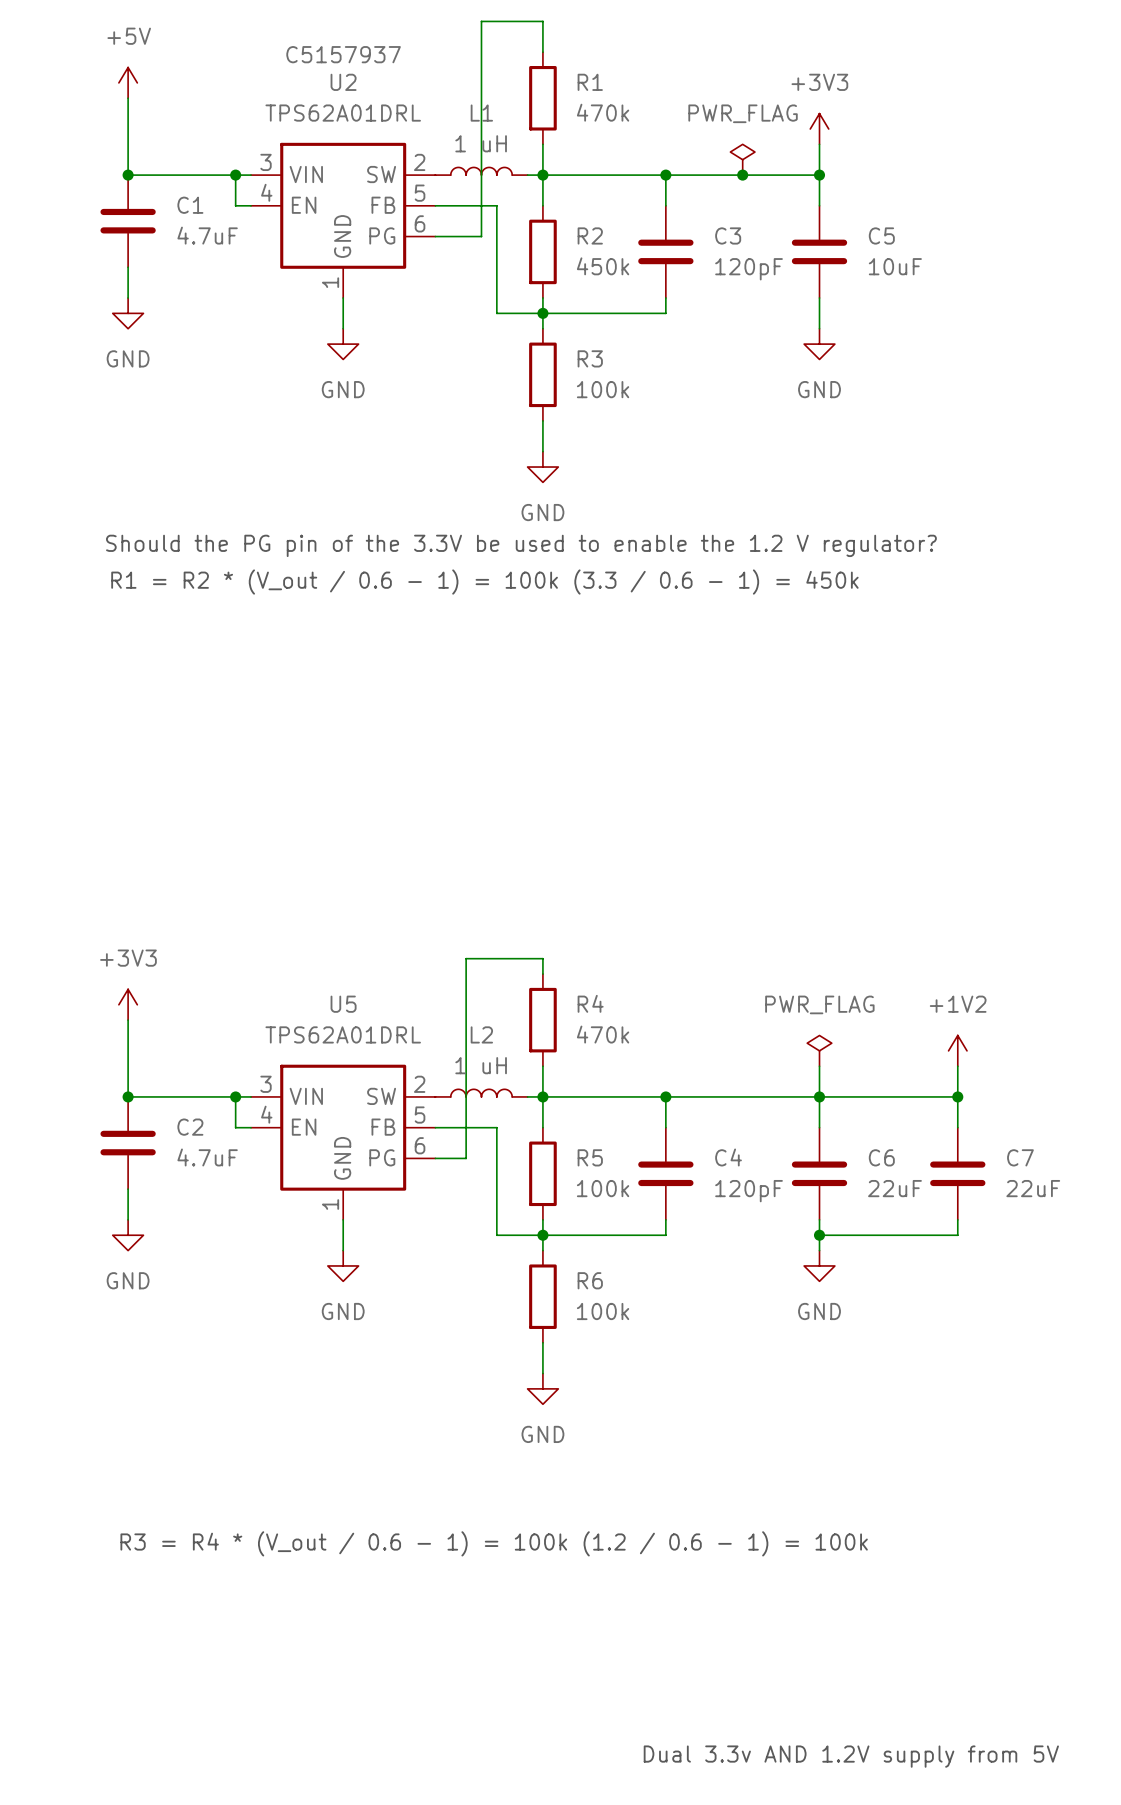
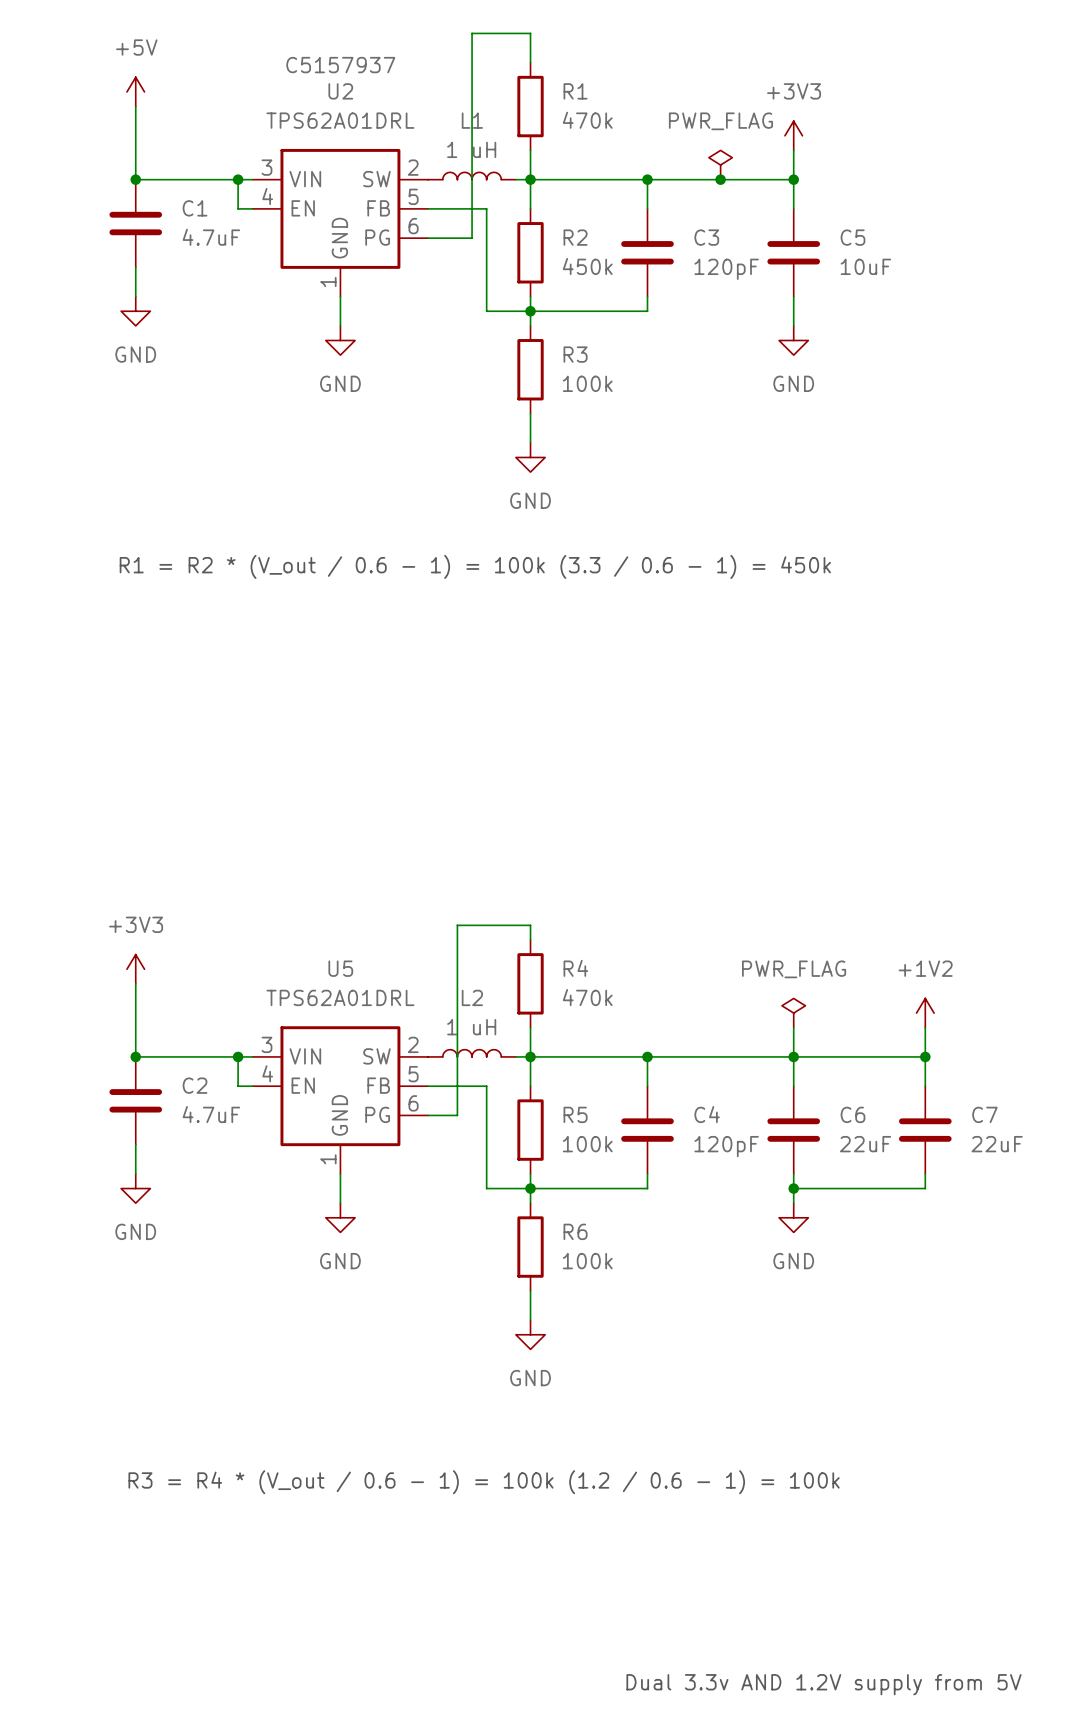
text: Should the PG pin of the 3.3V be used to enable the 1.2 V regulator? (521, 545) -> none

